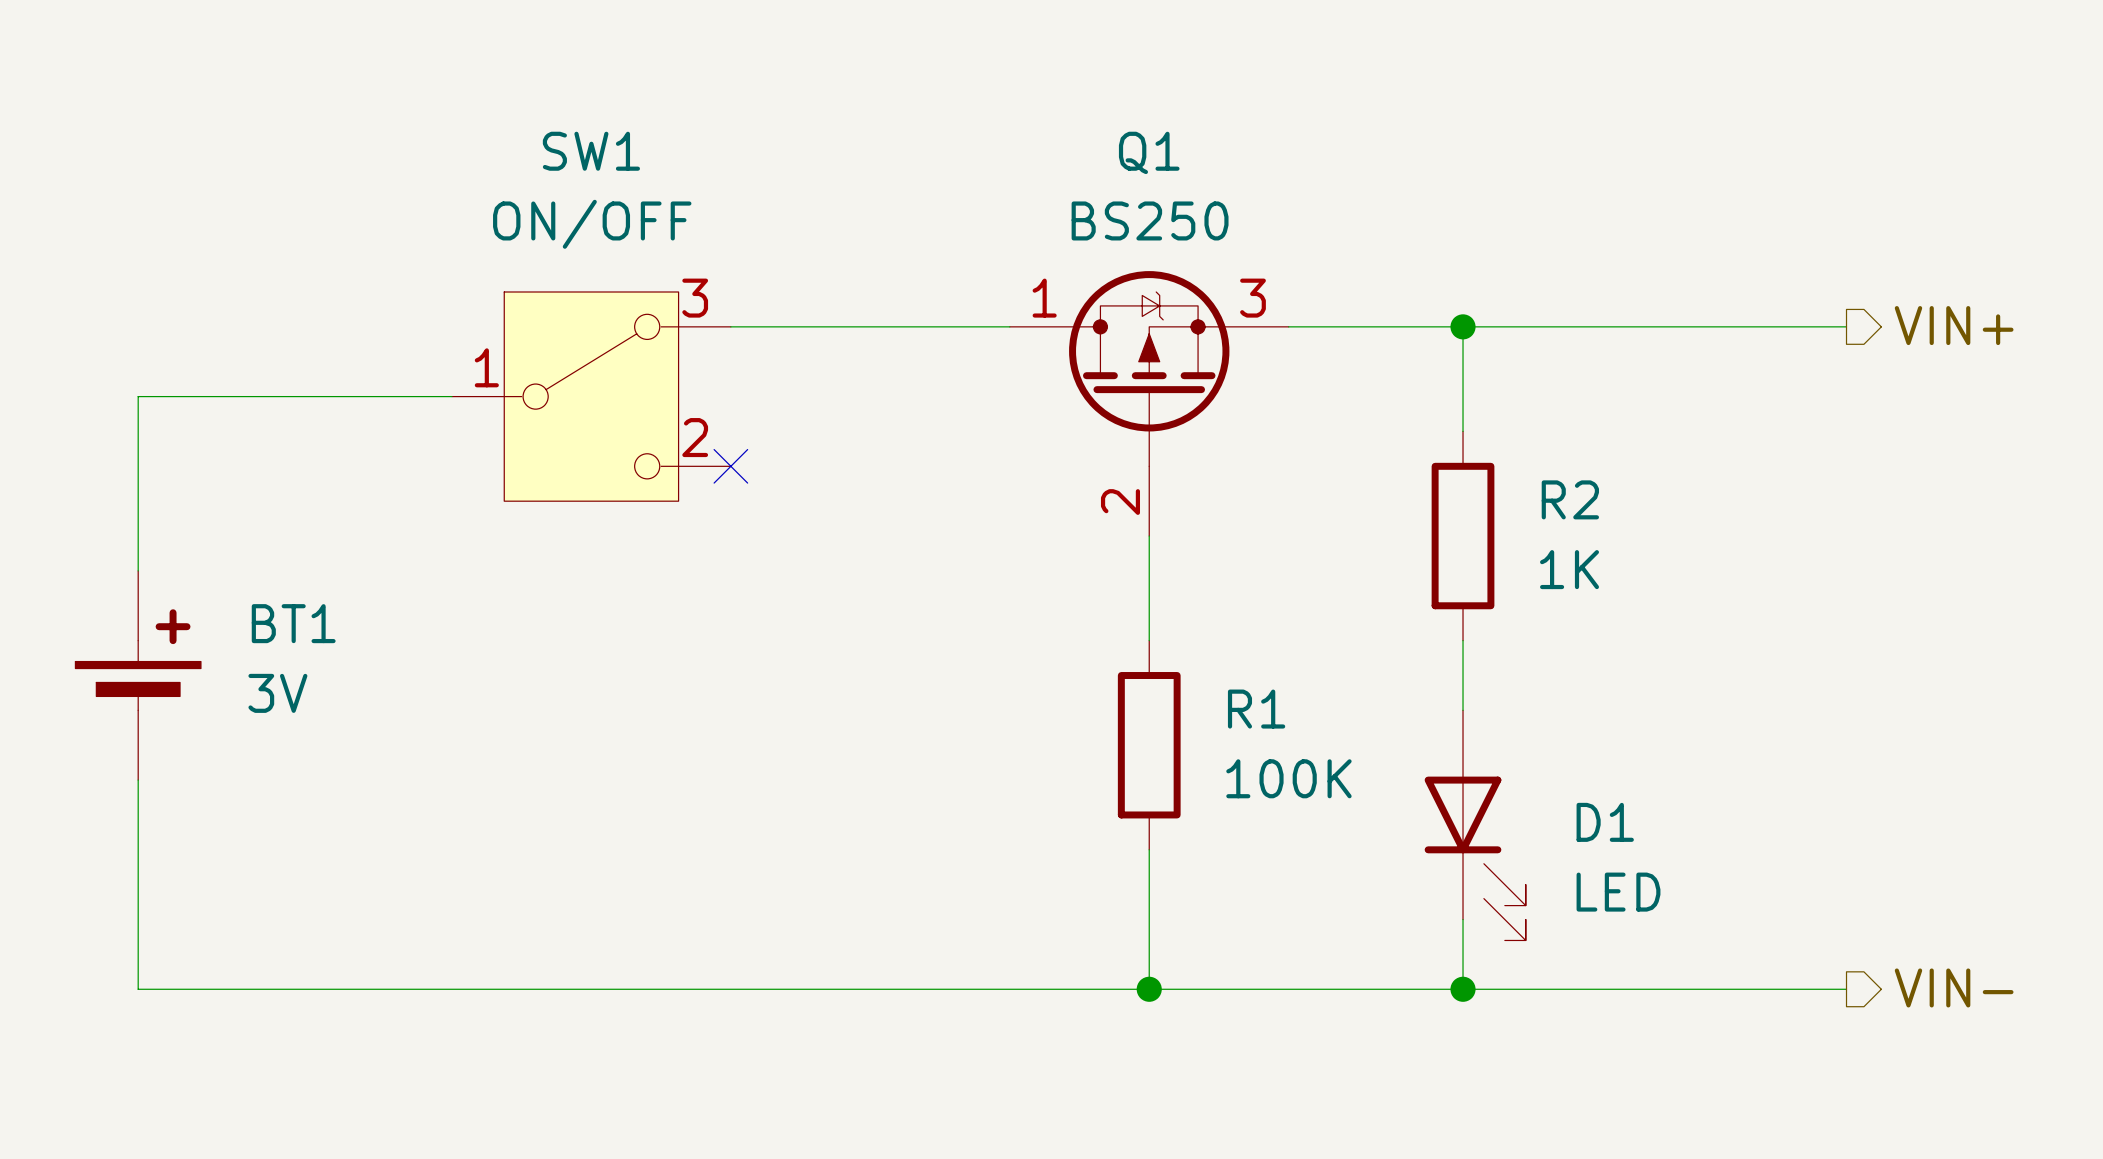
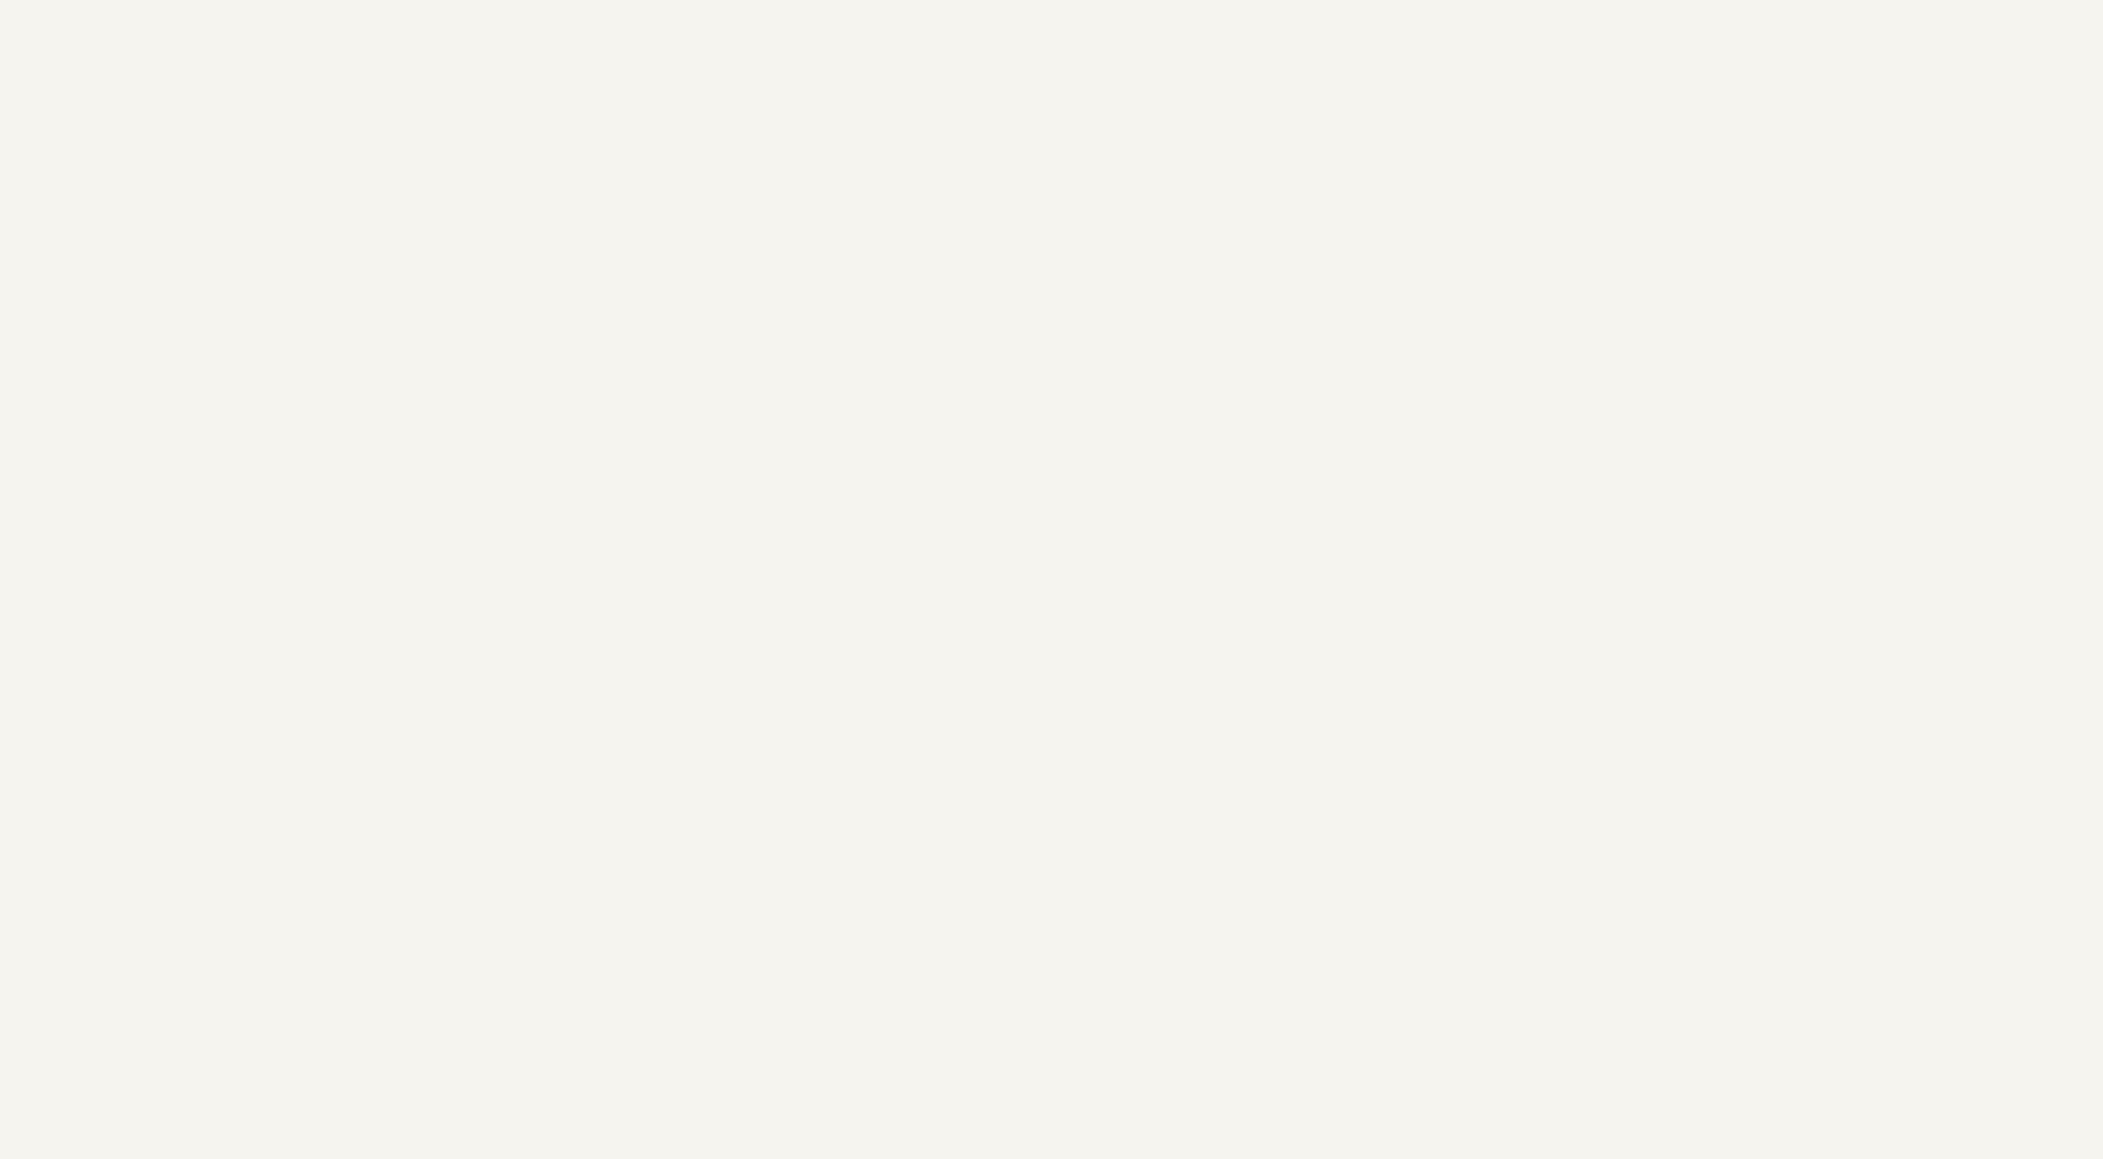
hierarchical label: VIN+ (1954, 325) -> none
wire: (730, 326) (1009, 326) -> none
wire: (1288, 326) (1846, 326) -> none
wire: (1463, 326) (1463, 431) -> none
junction: (1463, 326) -> none
wire: (451, 396) (138, 396) (138, 570) -> none
SW1: ON/OFF (591, 396) -> none
Q1: BS250 (1149, 403) -> none
no-connect mark: (730, 466) -> none
wire: (1149, 536) (1149, 640) -> none
R2: 1K (1463, 536) -> none
wire: (1463, 640) (1463, 710) -> none
BT1: 3V (138, 675) -> none
R1: 100K (1149, 745) -> none
wire: (138, 780) (138, 989) (1846, 989) -> none
D1: LED (1475, 825) -> none
wire: (1149, 849) (1149, 989) -> none
wire: (1463, 919) (1463, 989) -> none
hierarchical label: VIN- (1954, 987) -> none
junction: (1149, 989) -> none
junction: (1463, 989) -> none

